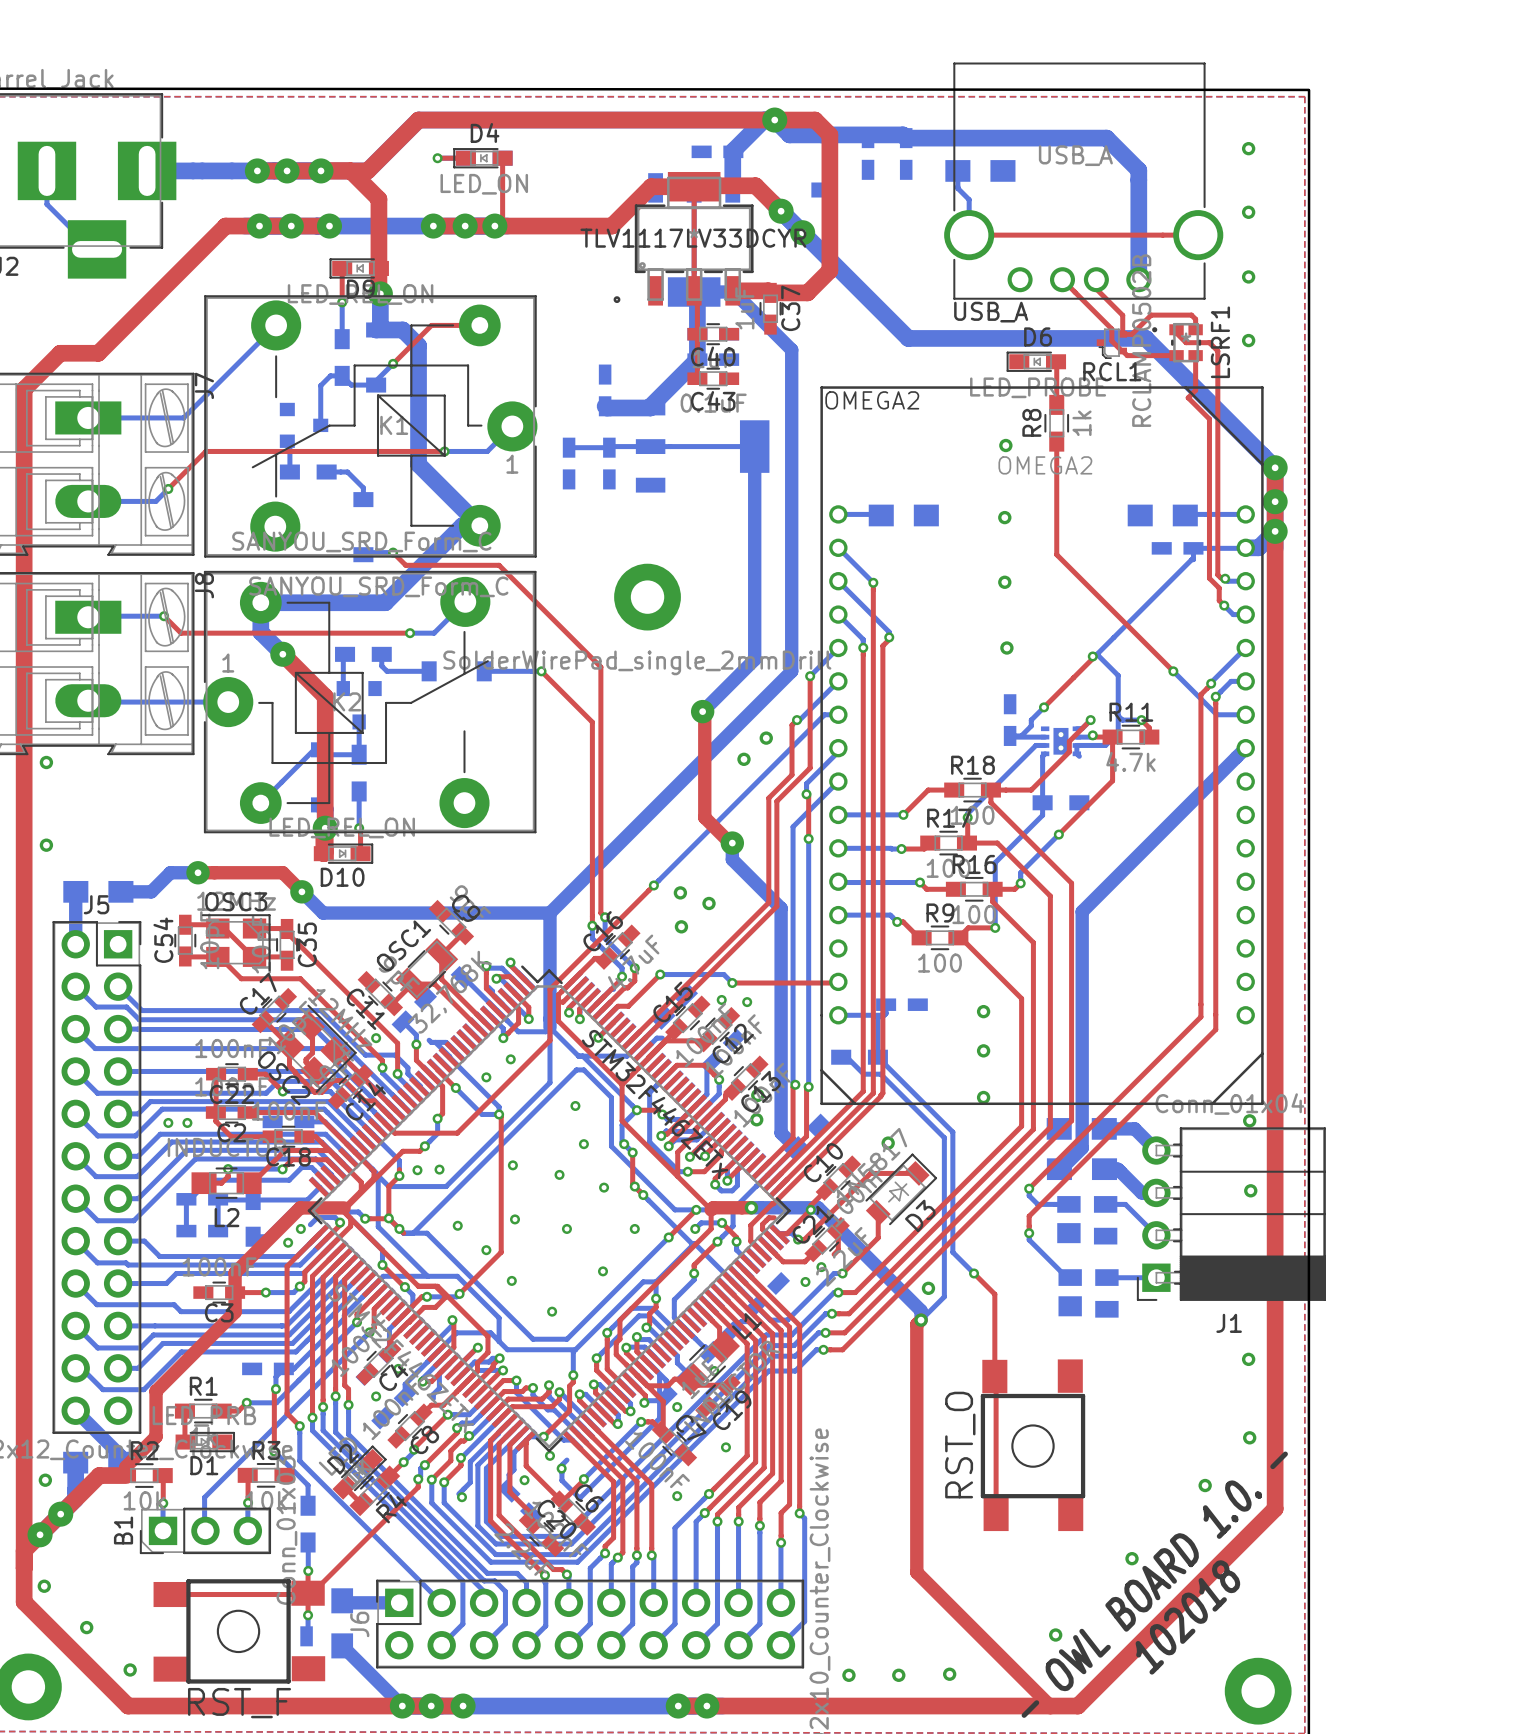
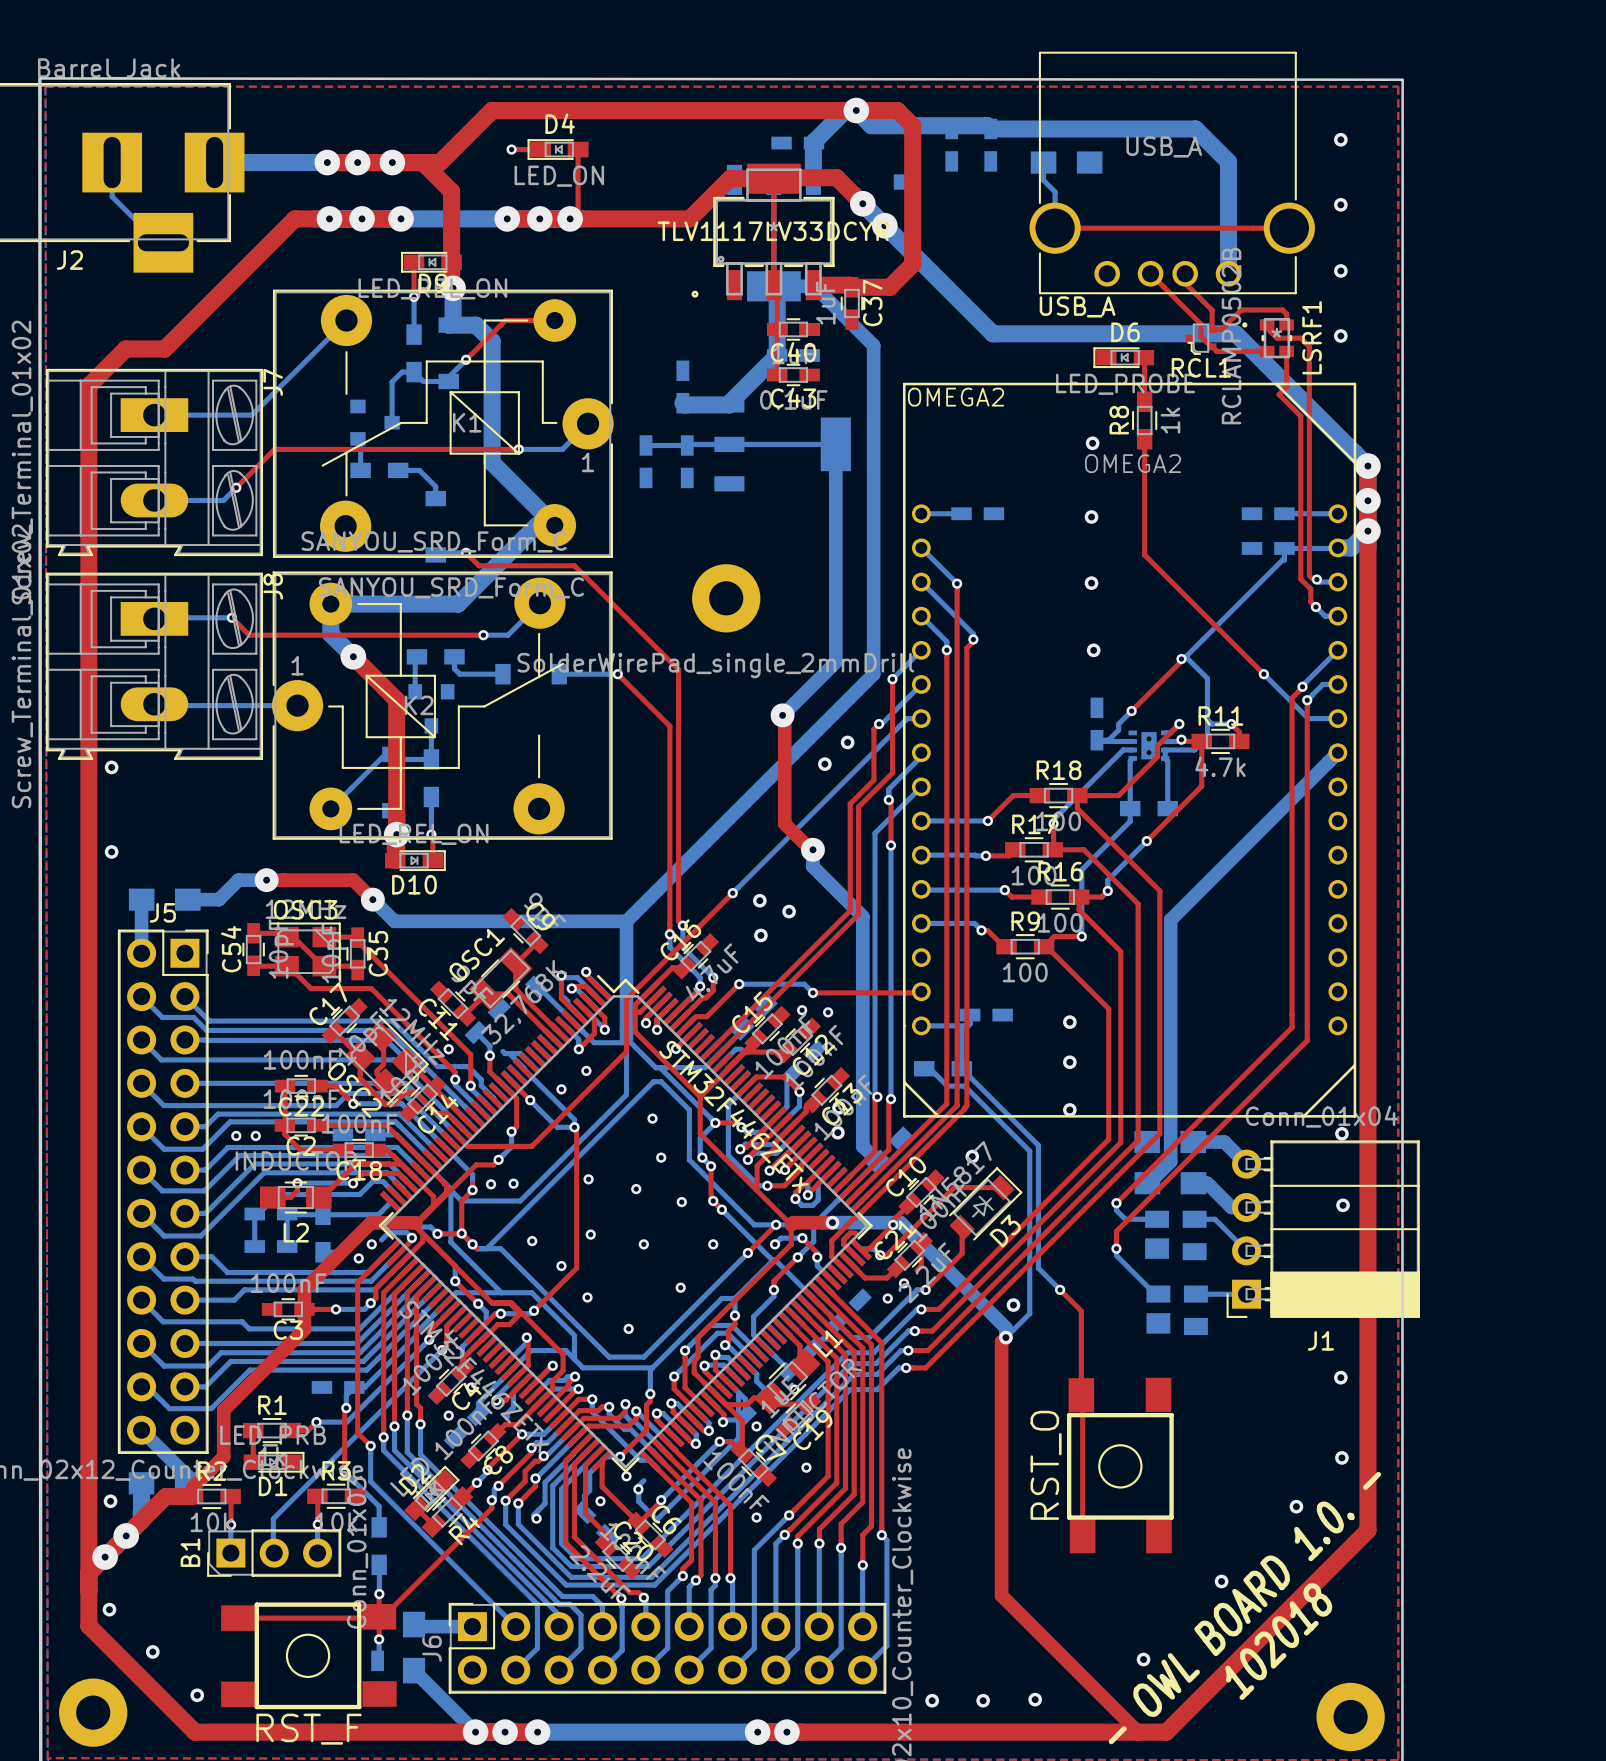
part footprint: [868, 504, 939, 527] -> [951, 507, 1005, 521]
part footprint: [1127, 504, 1198, 527] -> [1241, 507, 1295, 521]
bottom track: none -> (1167, 761) (1167, 808)

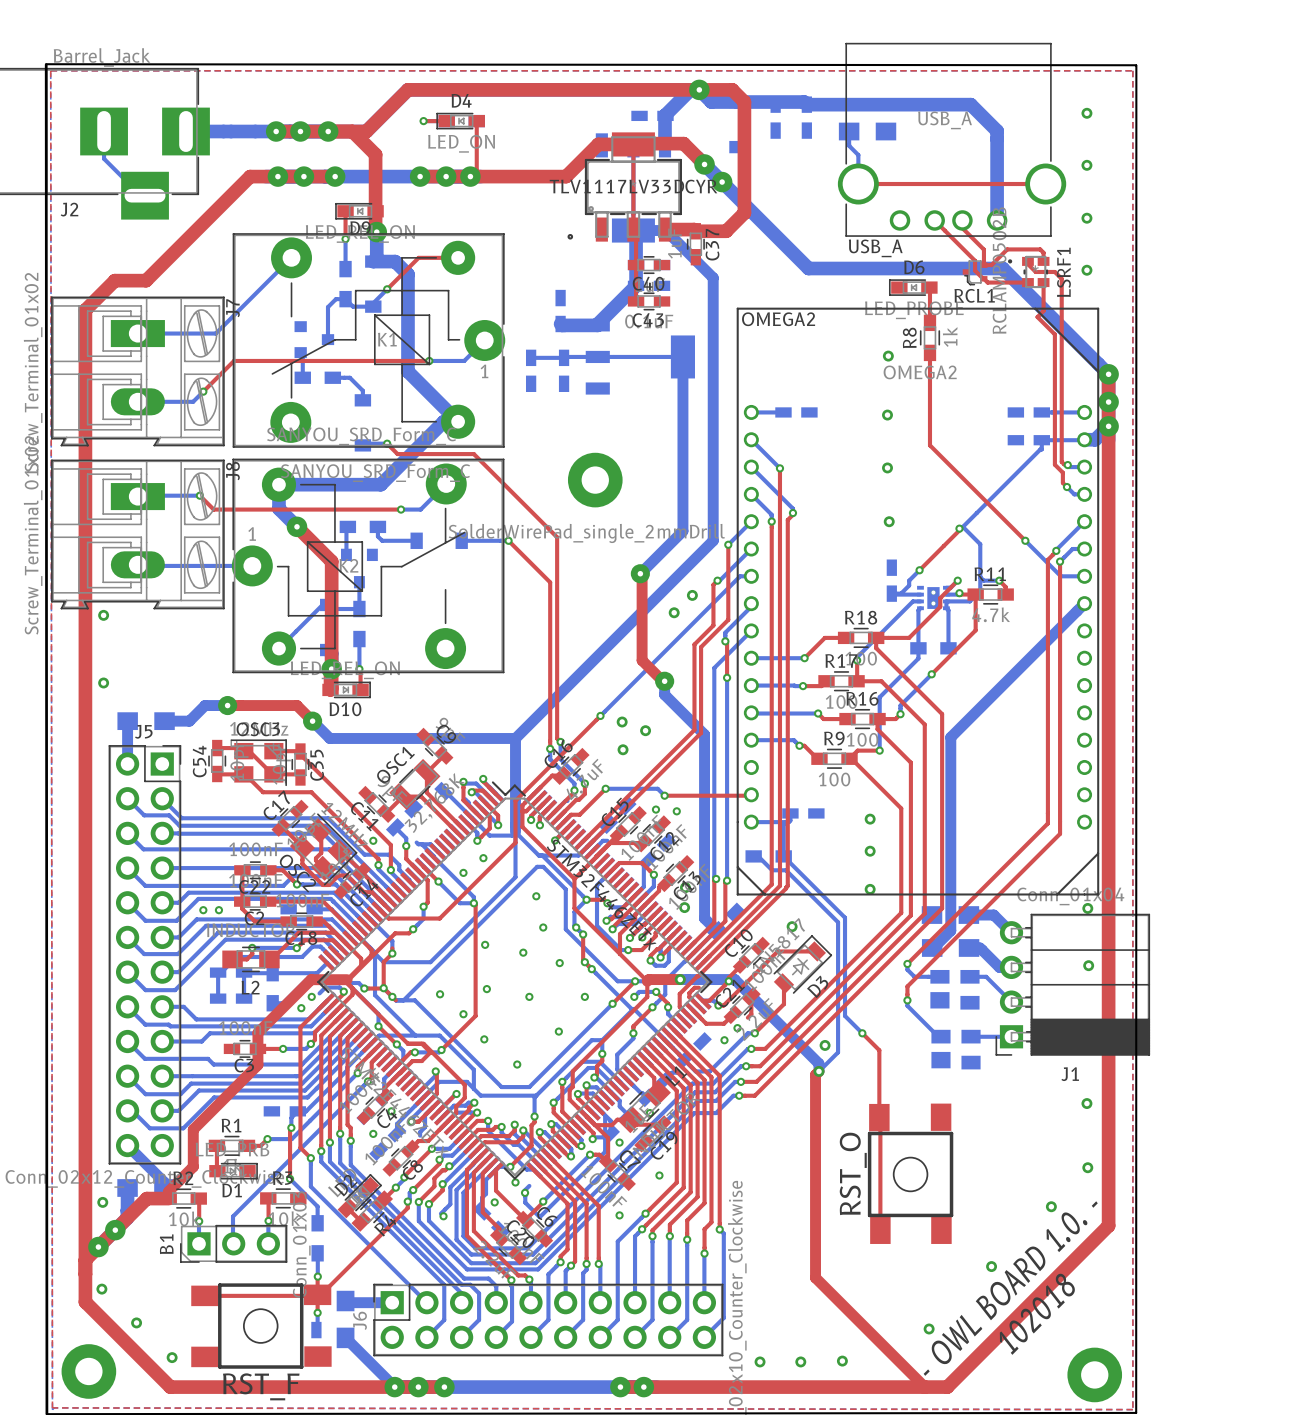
via: (513, 1183) -> none
via: (491, 1184) -> none

